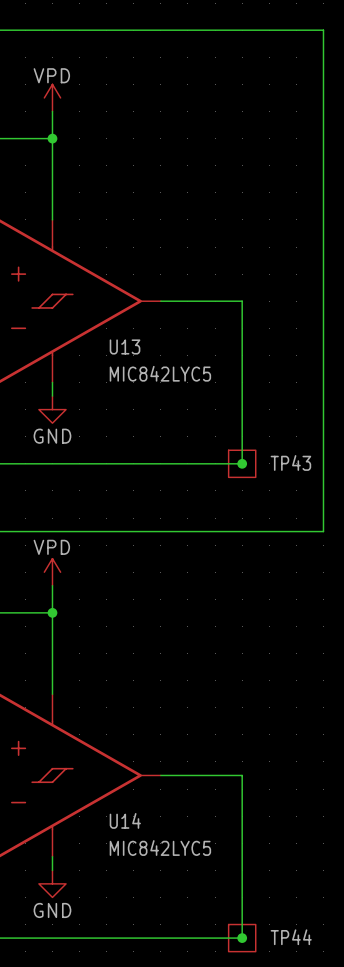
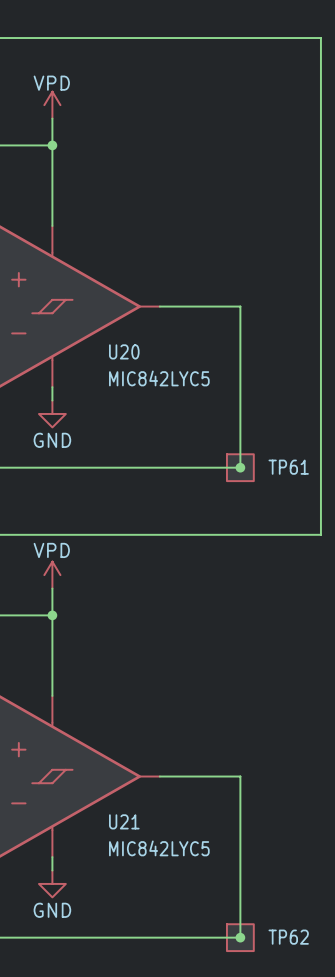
U13 name: U13 (125, 346) -> U20 (124, 351)
TP43 name: TP43 (290, 462) -> TP61 (288, 467)
U14 name: U14 (125, 820) -> U21 (124, 821)
TP44 name: TP44 (291, 937) -> TP62 (288, 937)

